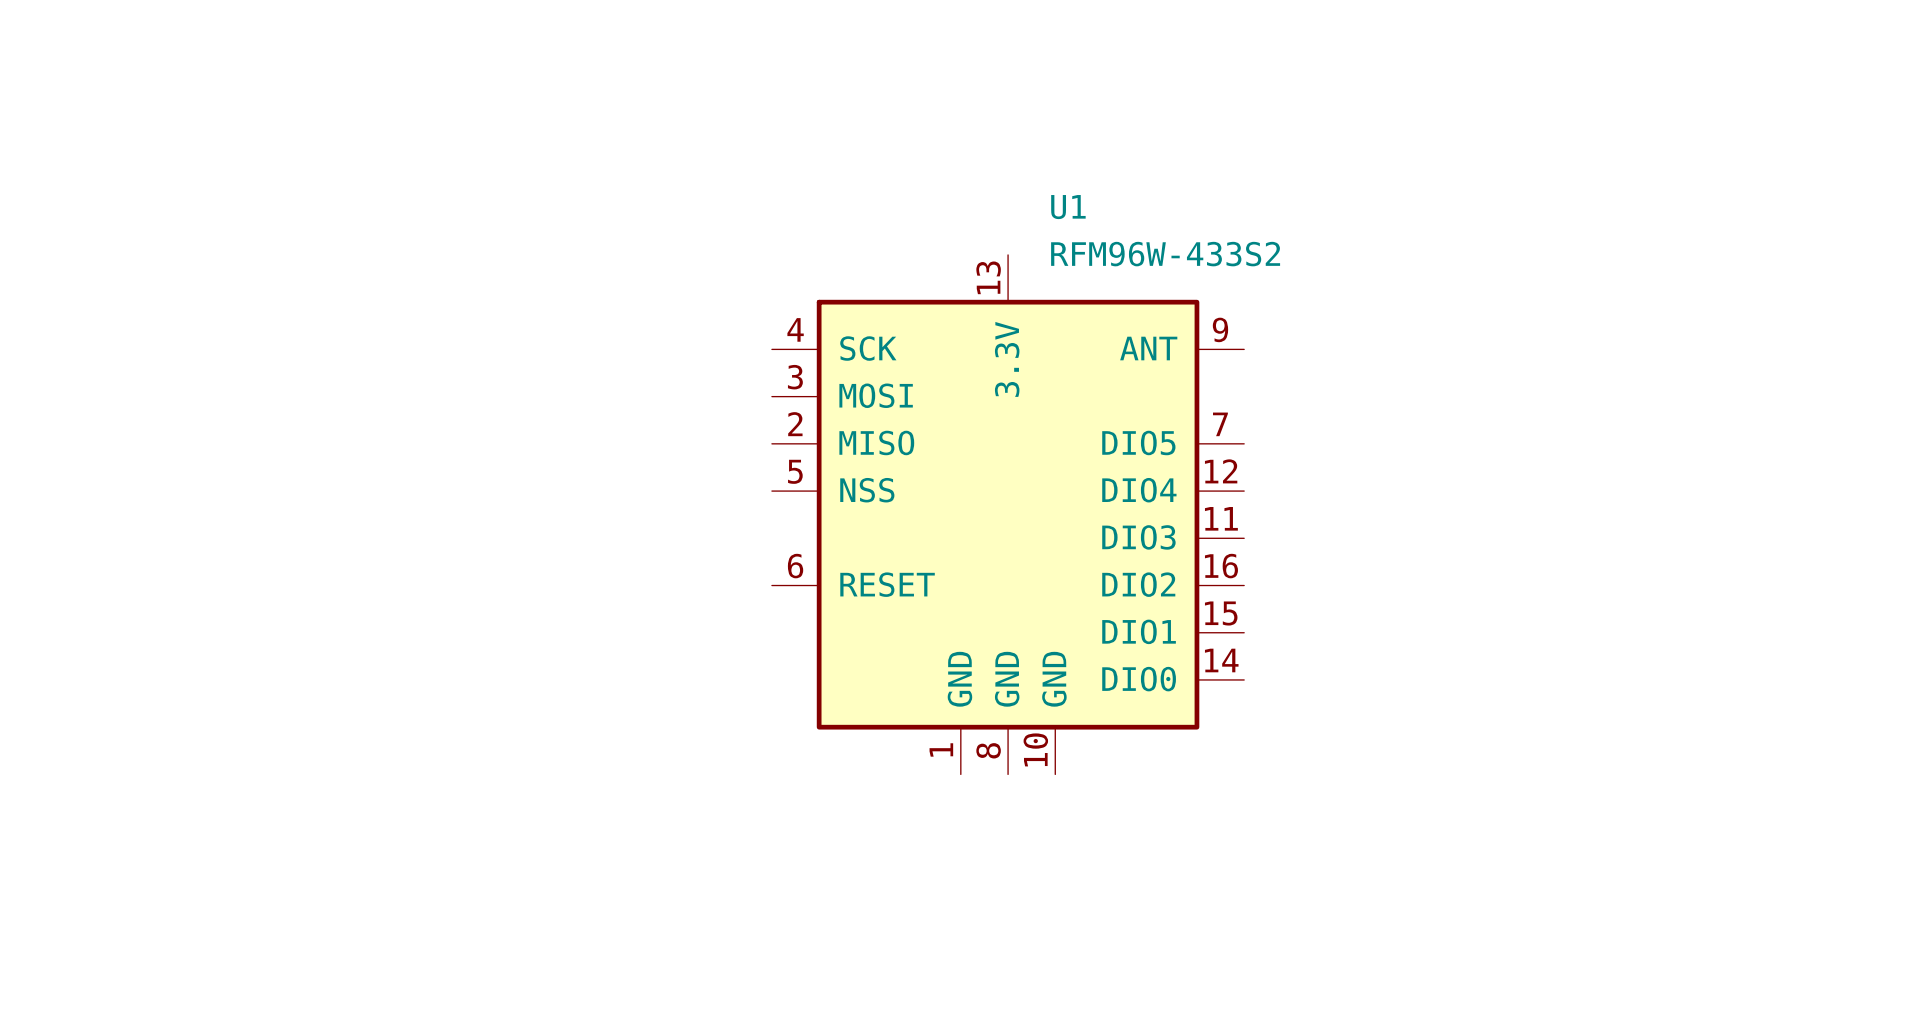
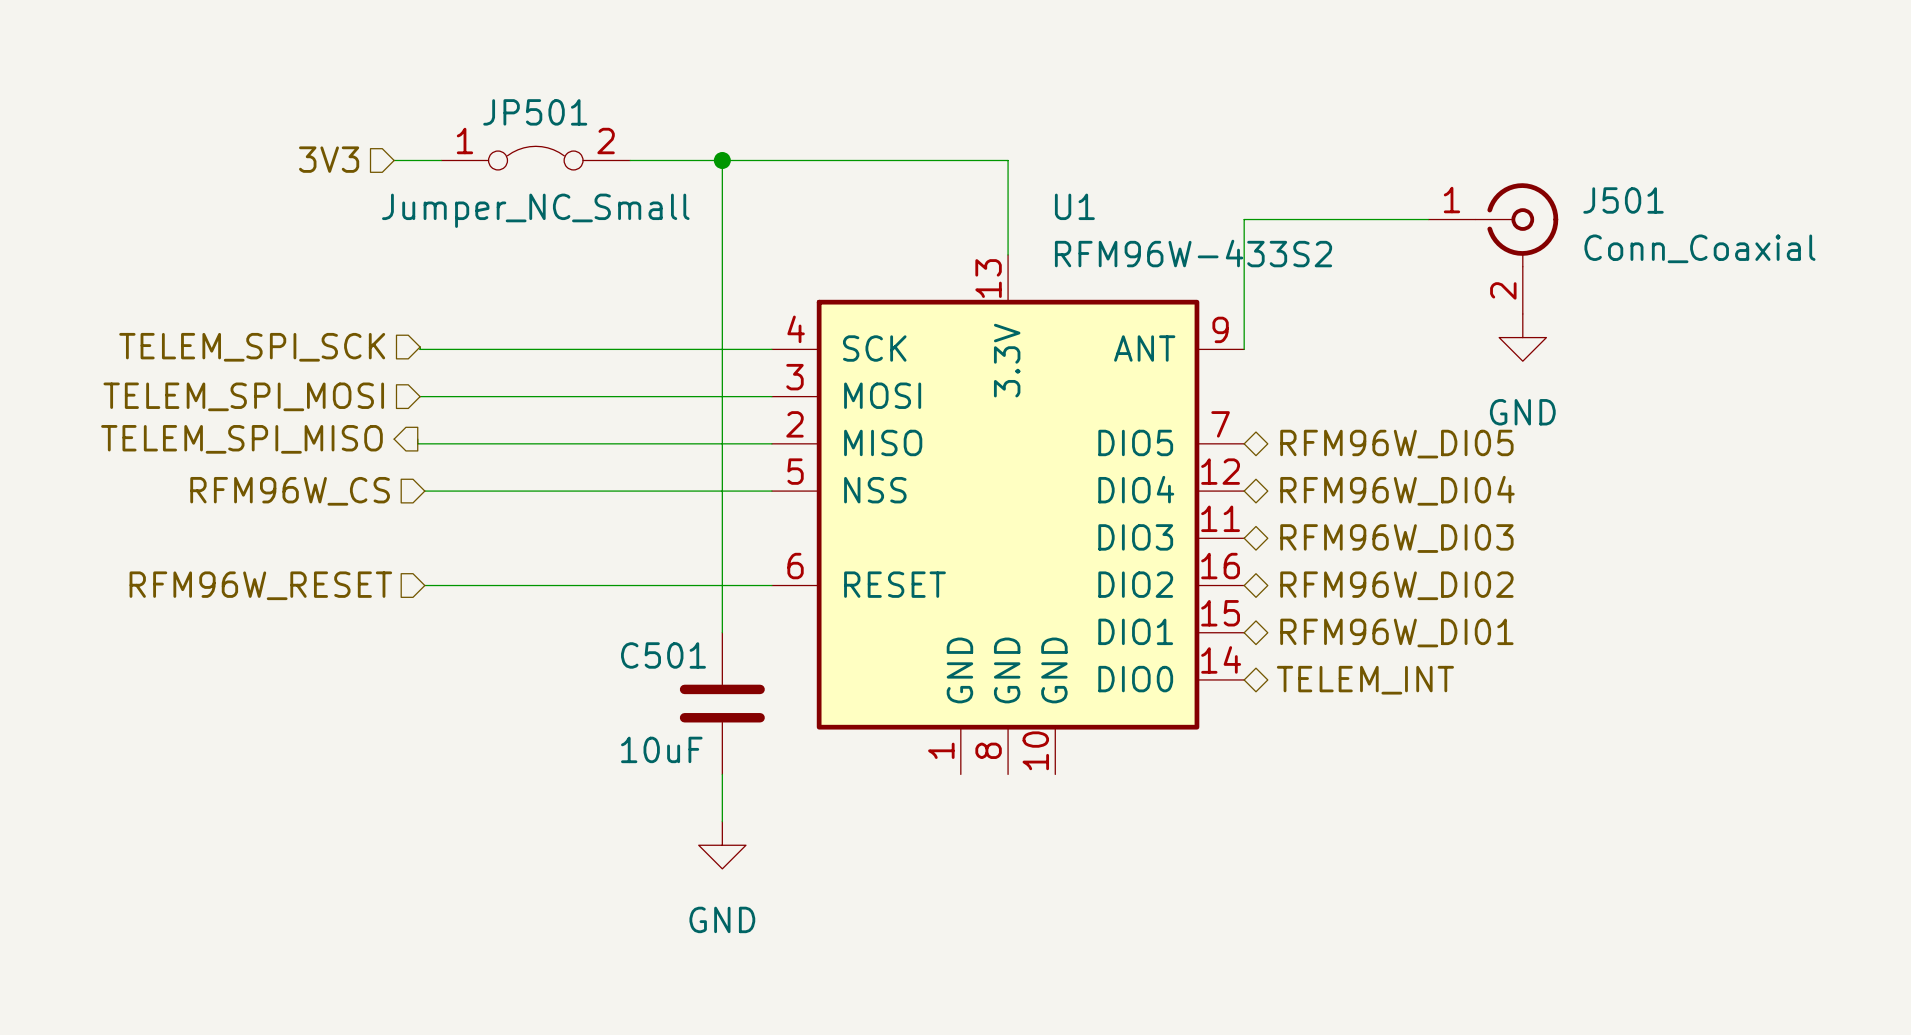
JP501: none -> Jumper_NC_Small (535, 158)
hierarchical label: none -> 3V3 (329, 159)
wire: none -> (394, 160) (441, 160)
wire: none -> (630, 160) (1008, 160) (1008, 254)
wire: none -> (722, 160) (722, 632)
junction: none -> (722, 160)
wire: none -> (1428, 219) (1244, 219) (1244, 349)
J501: none -> Conn_Coaxial (1493, 248)
power symbol: none -> GND (1522, 337)
wire: none -> (420, 347) (420, 349) (771, 349)
hierarchical label: none -> TELEM_SPI_SCK (252, 347)
wire: none -> (420, 396) (771, 396)
hierarchical label: none -> TELEM_SPI_MOSI (243, 396)
wire: none -> (417, 439) (417, 443) (771, 443)
hierarchical label: none -> TELEM_SPI_MISO (241, 439)
hierarchical label: none -> RFM96W_DI05 (1396, 444)
wire: none -> (424, 491) (771, 491)
hierarchical label: none -> RFM96W_CS (290, 491)
hierarchical label: none -> RFM96W_DI04 (1397, 490)
hierarchical label: none -> RFM96W_DI03 (1396, 538)
wire: none -> (424, 585) (771, 585)
hierarchical label: none -> RFM96W_RESET (260, 585)
hierarchical label: none -> RFM96W_DI02 (1396, 585)
hierarchical label: none -> RFM96W_DI01 (1396, 632)
hierarchical label: none -> TELEM_INT (1365, 680)
C501: none -> 10uF (722, 703)
wire: none -> (722, 774) (722, 821)
power symbol: none -> GND (722, 845)

